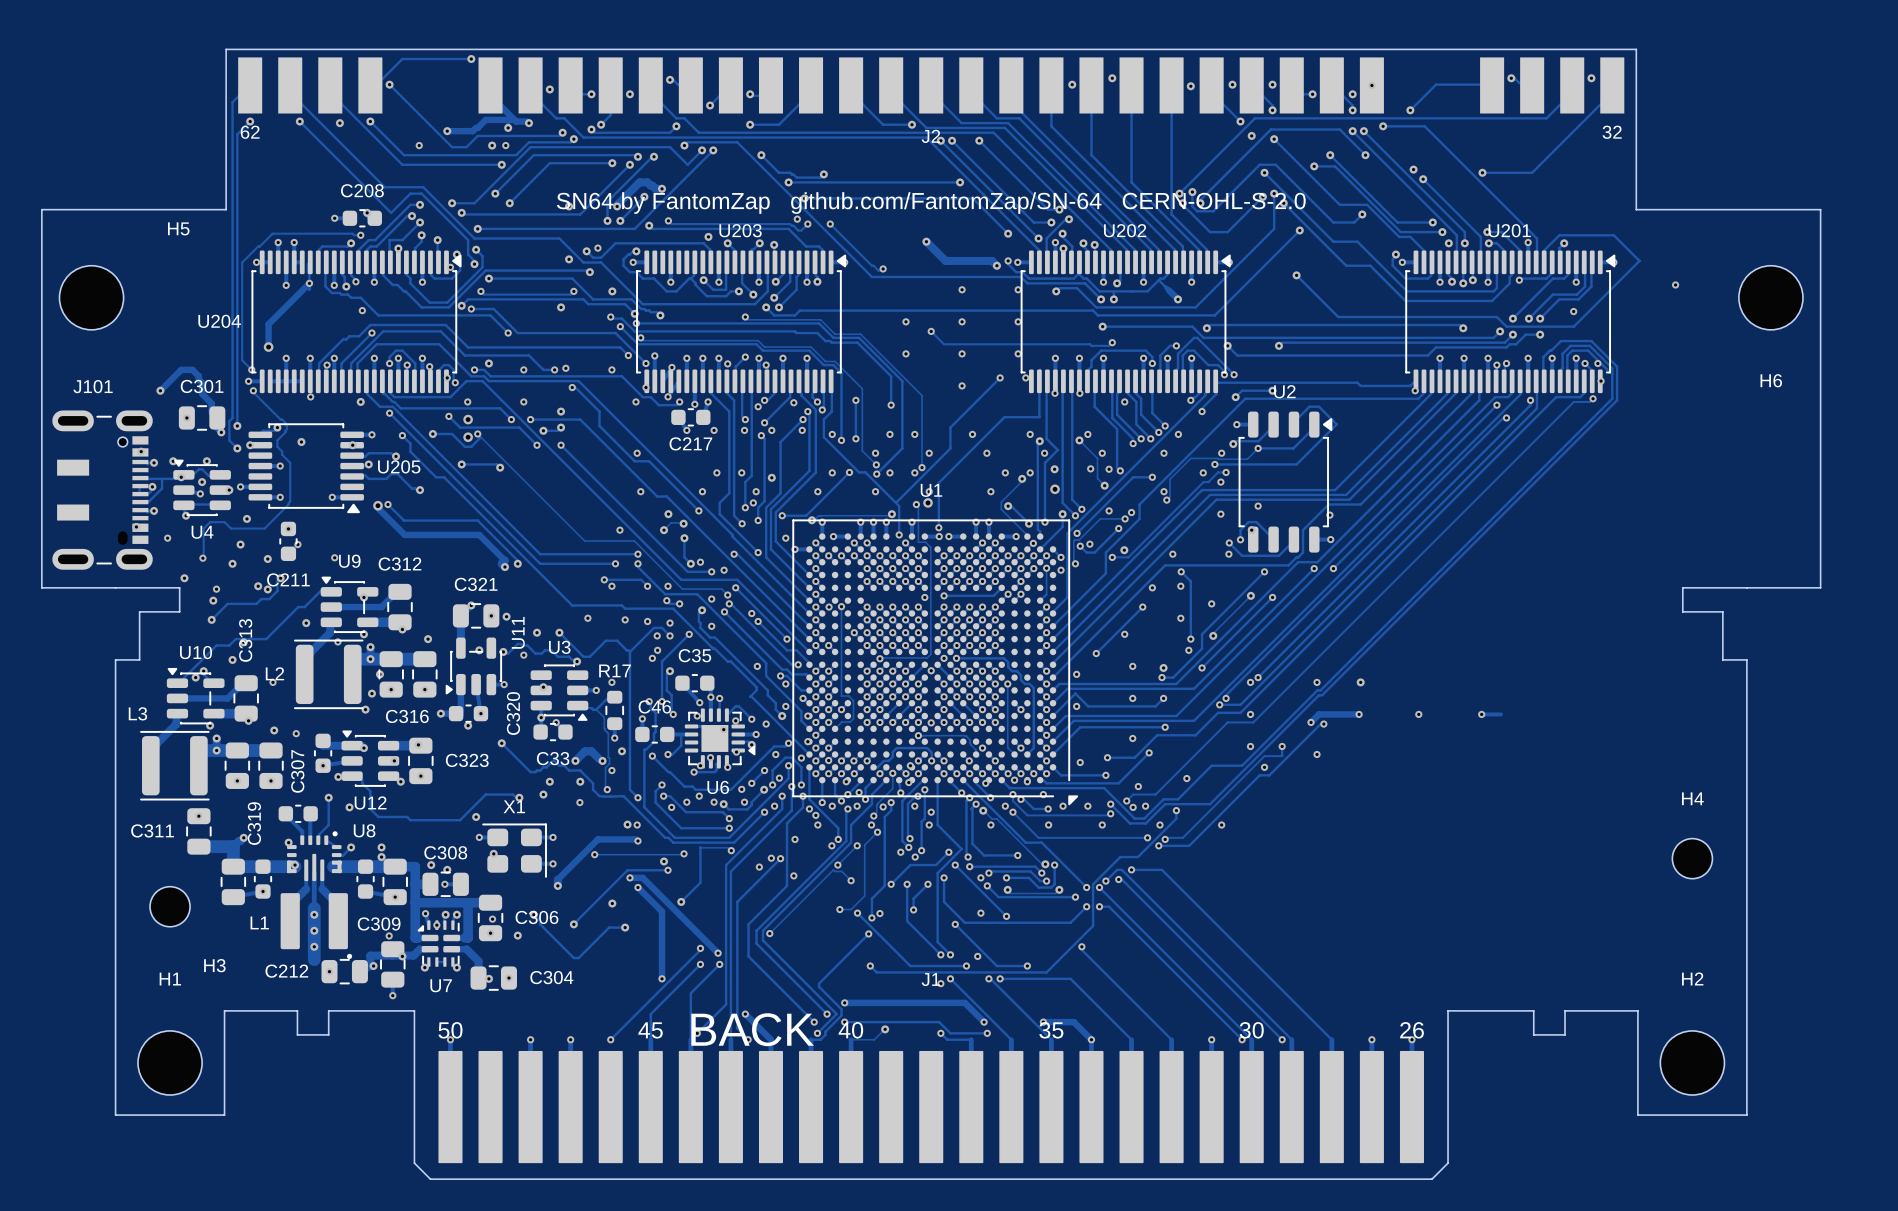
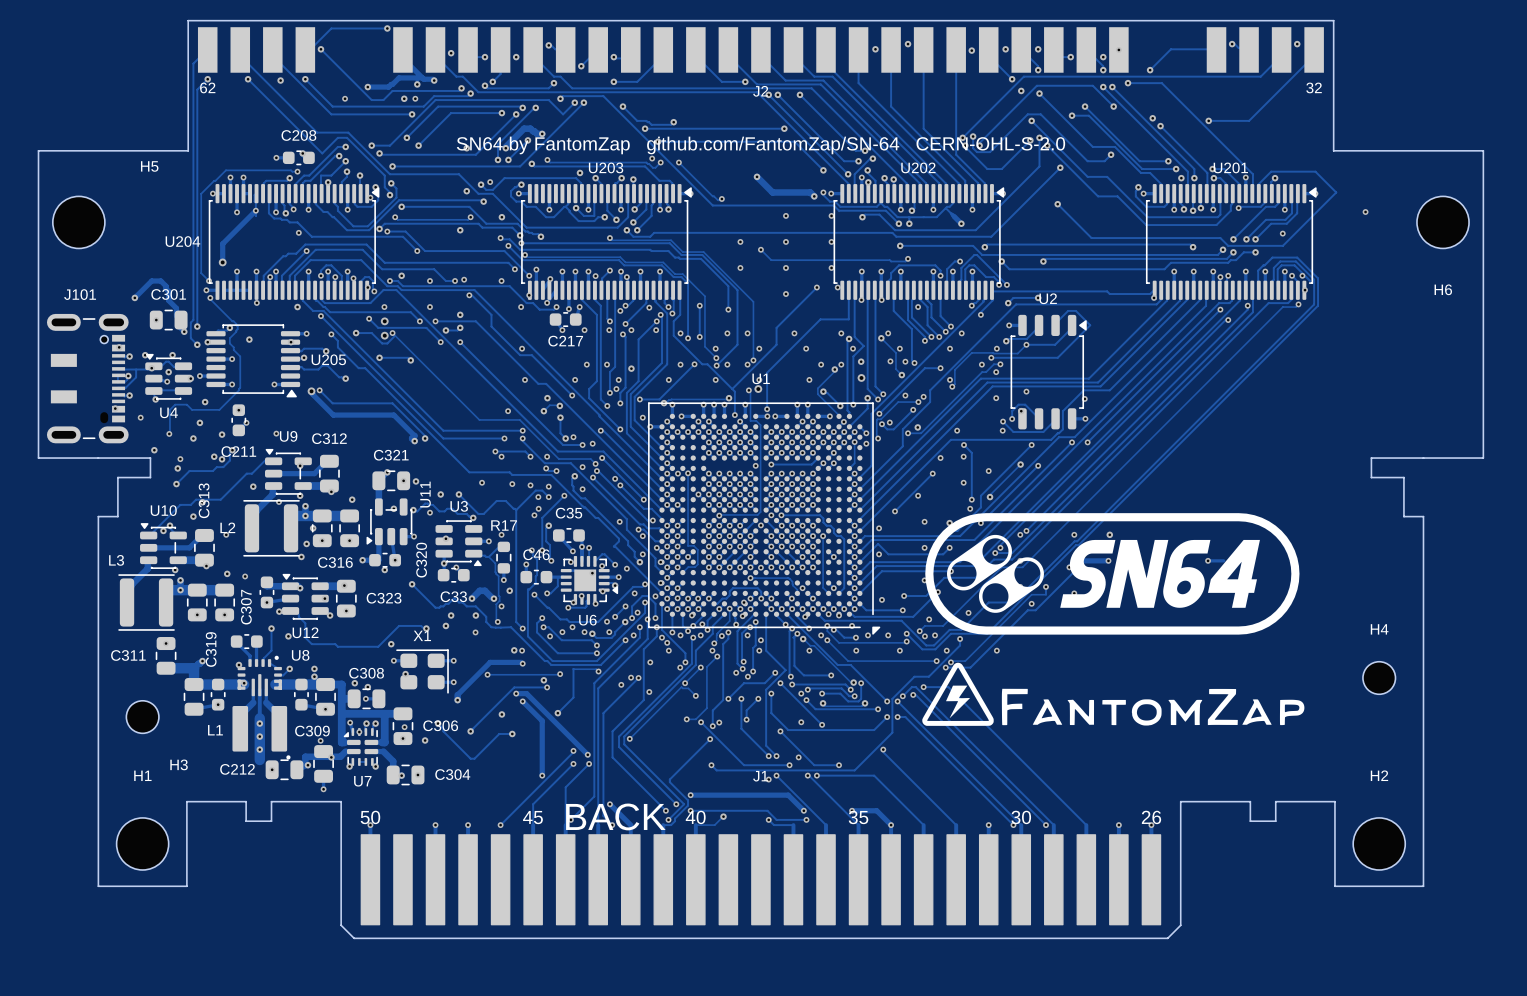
drawing: none -> [925, 513, 1300, 635]
drawing: none -> [922, 662, 1305, 726]

